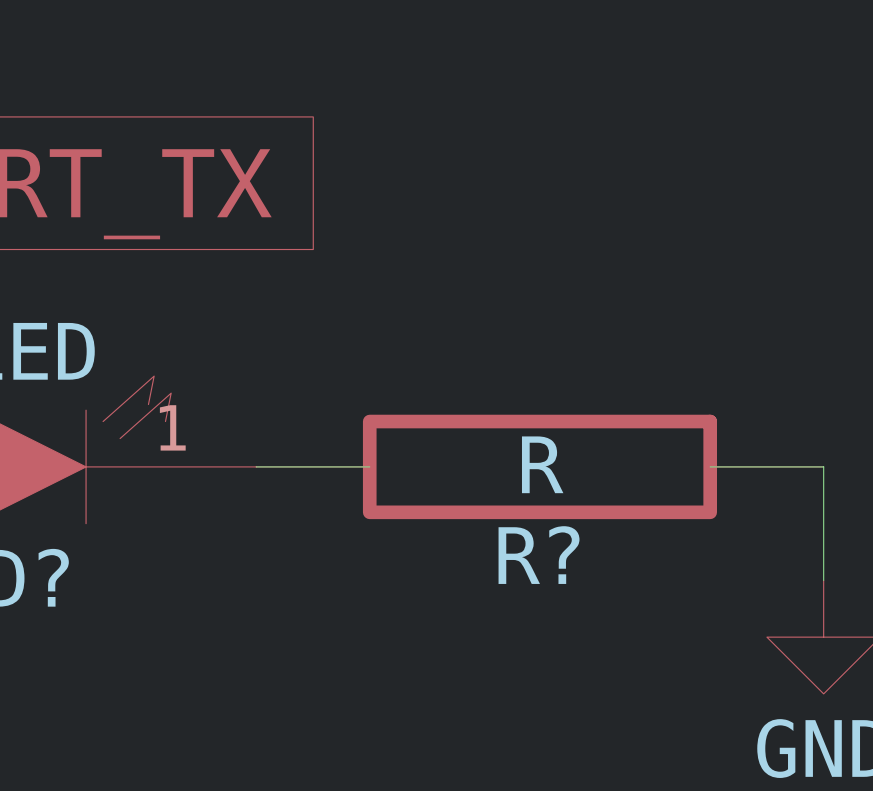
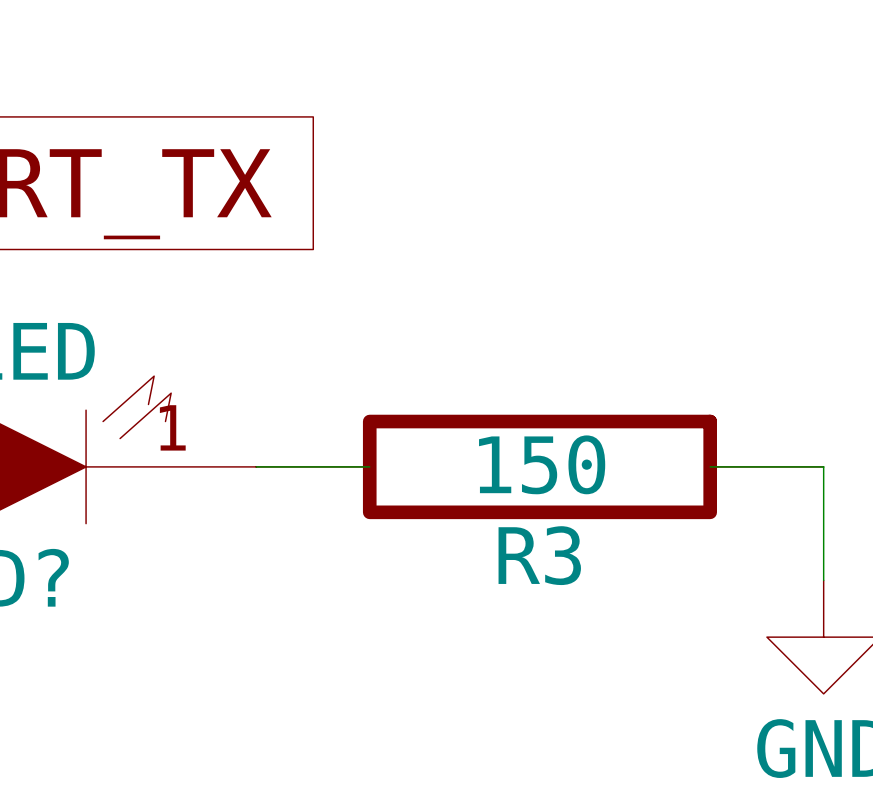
R? value: R (542, 464) -> 150 (542, 464)
R? name: R? (539, 555) -> R3 (539, 555)

